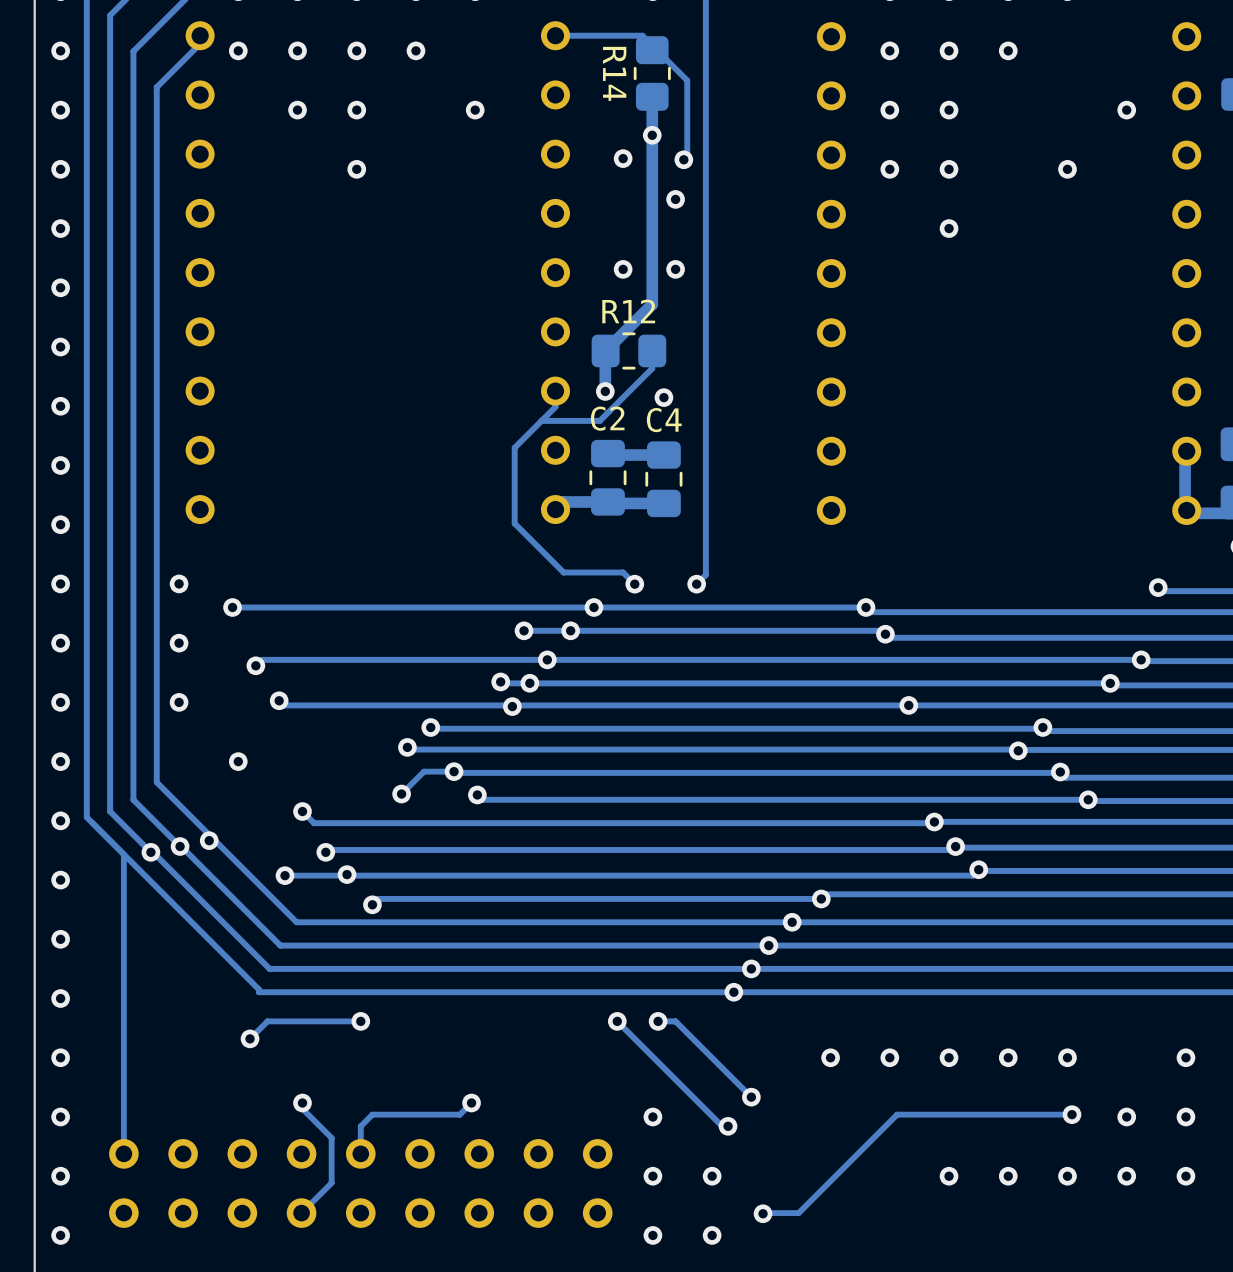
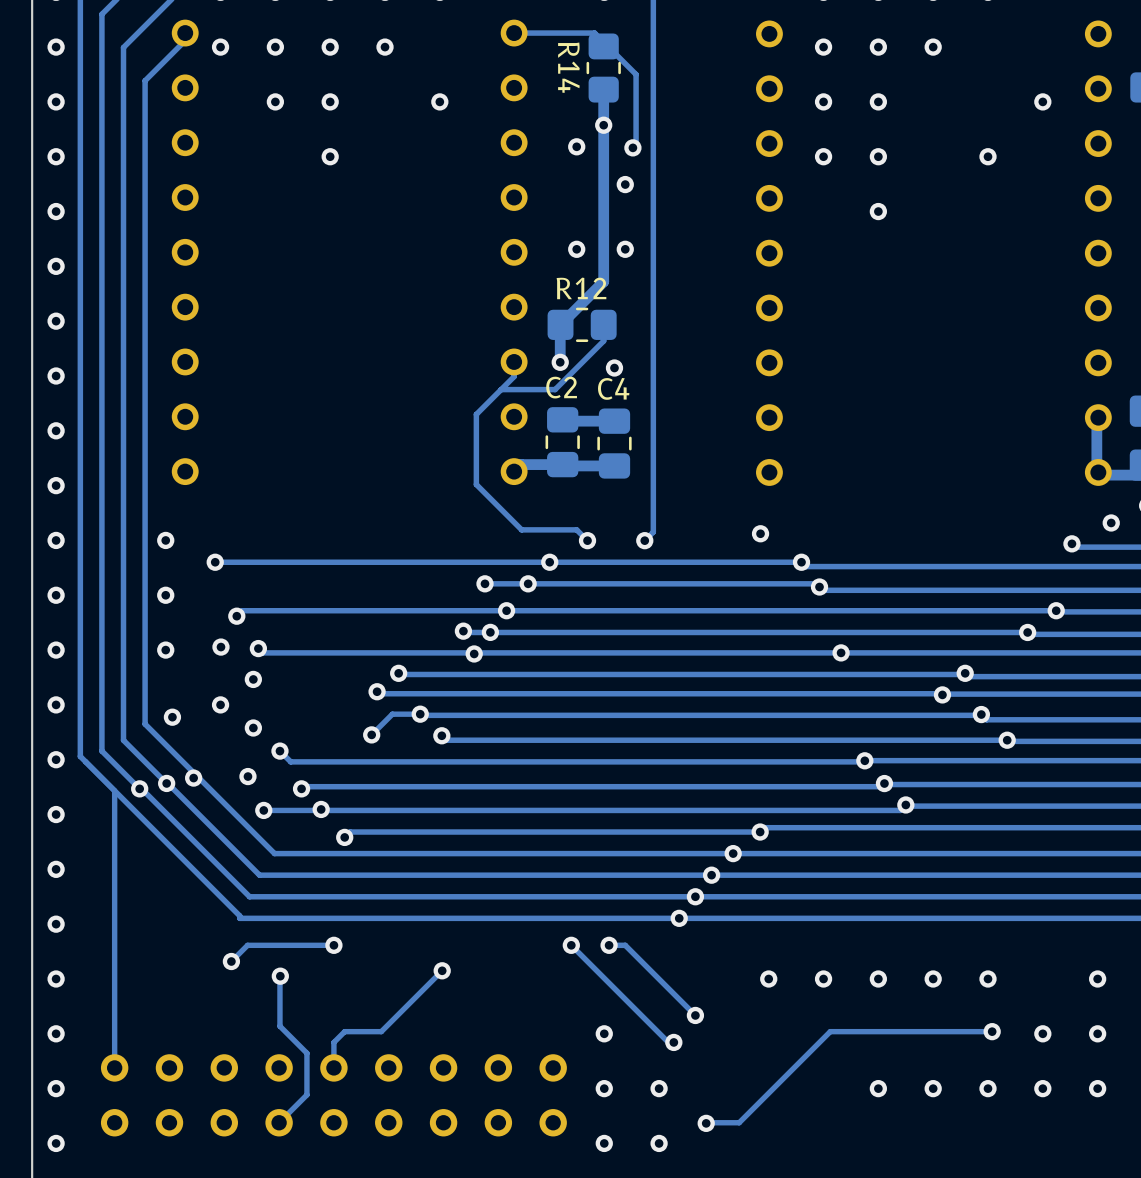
via: none -> (1111, 522)
via: none -> (760, 533)
via: none -> (220, 647)
via: none -> (253, 679)
via: none -> (172, 717)
via: none -> (253, 727)
via: none -> (247, 776)
track: none -> (280, 976) (279, 1020)
via position: (302, 1103) -> (280, 976)
track: (471, 1103) (459, 1114) (412, 1114) -> (442, 970) (381, 1031)
via position: (471, 1103) -> (442, 970)

